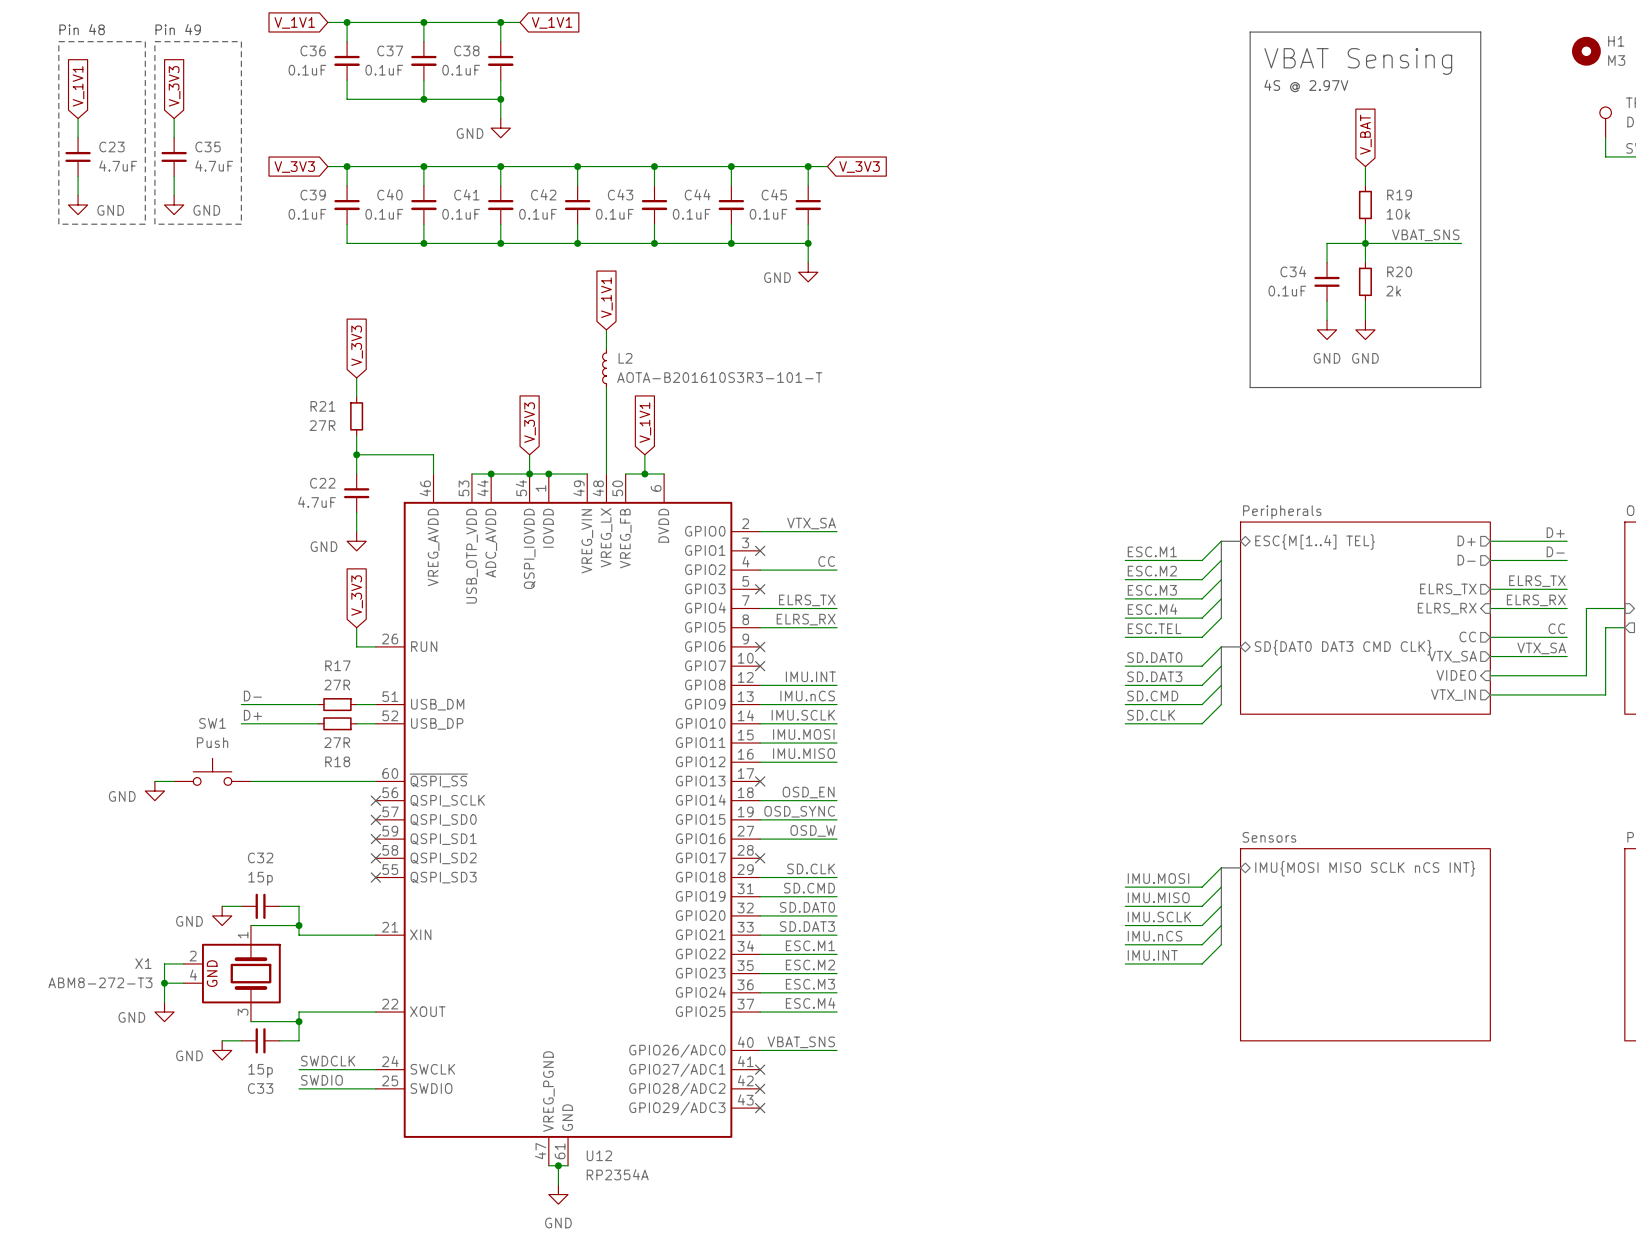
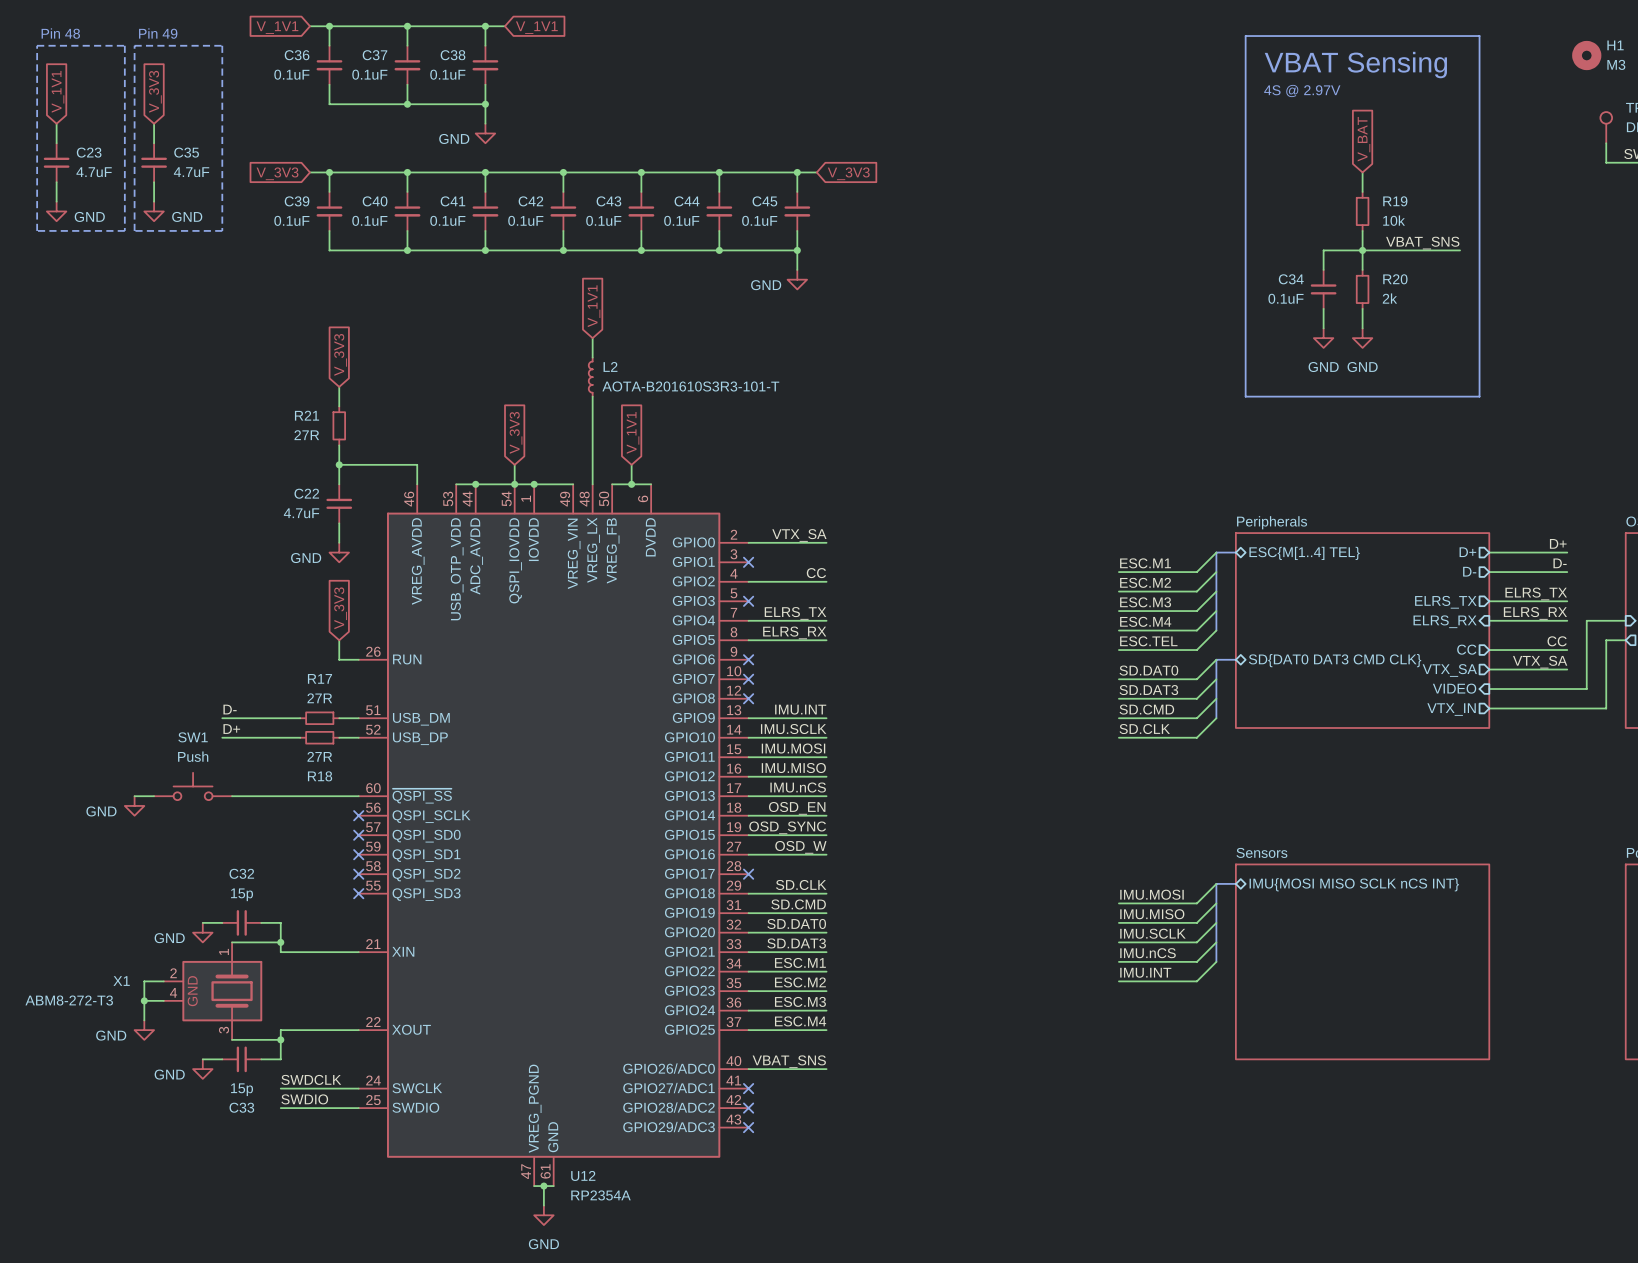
label: IMU.INT (810, 676) -> none
wire: (760, 685) (837, 685) -> (748, 796) (826, 796)
no-connect mark: none -> (748, 698)
label: IMU.nCS (807, 696) -> IMU.INT (800, 709)
label: none -> IMU.nCS (798, 787)
no-connect mark: (760, 781) -> none

